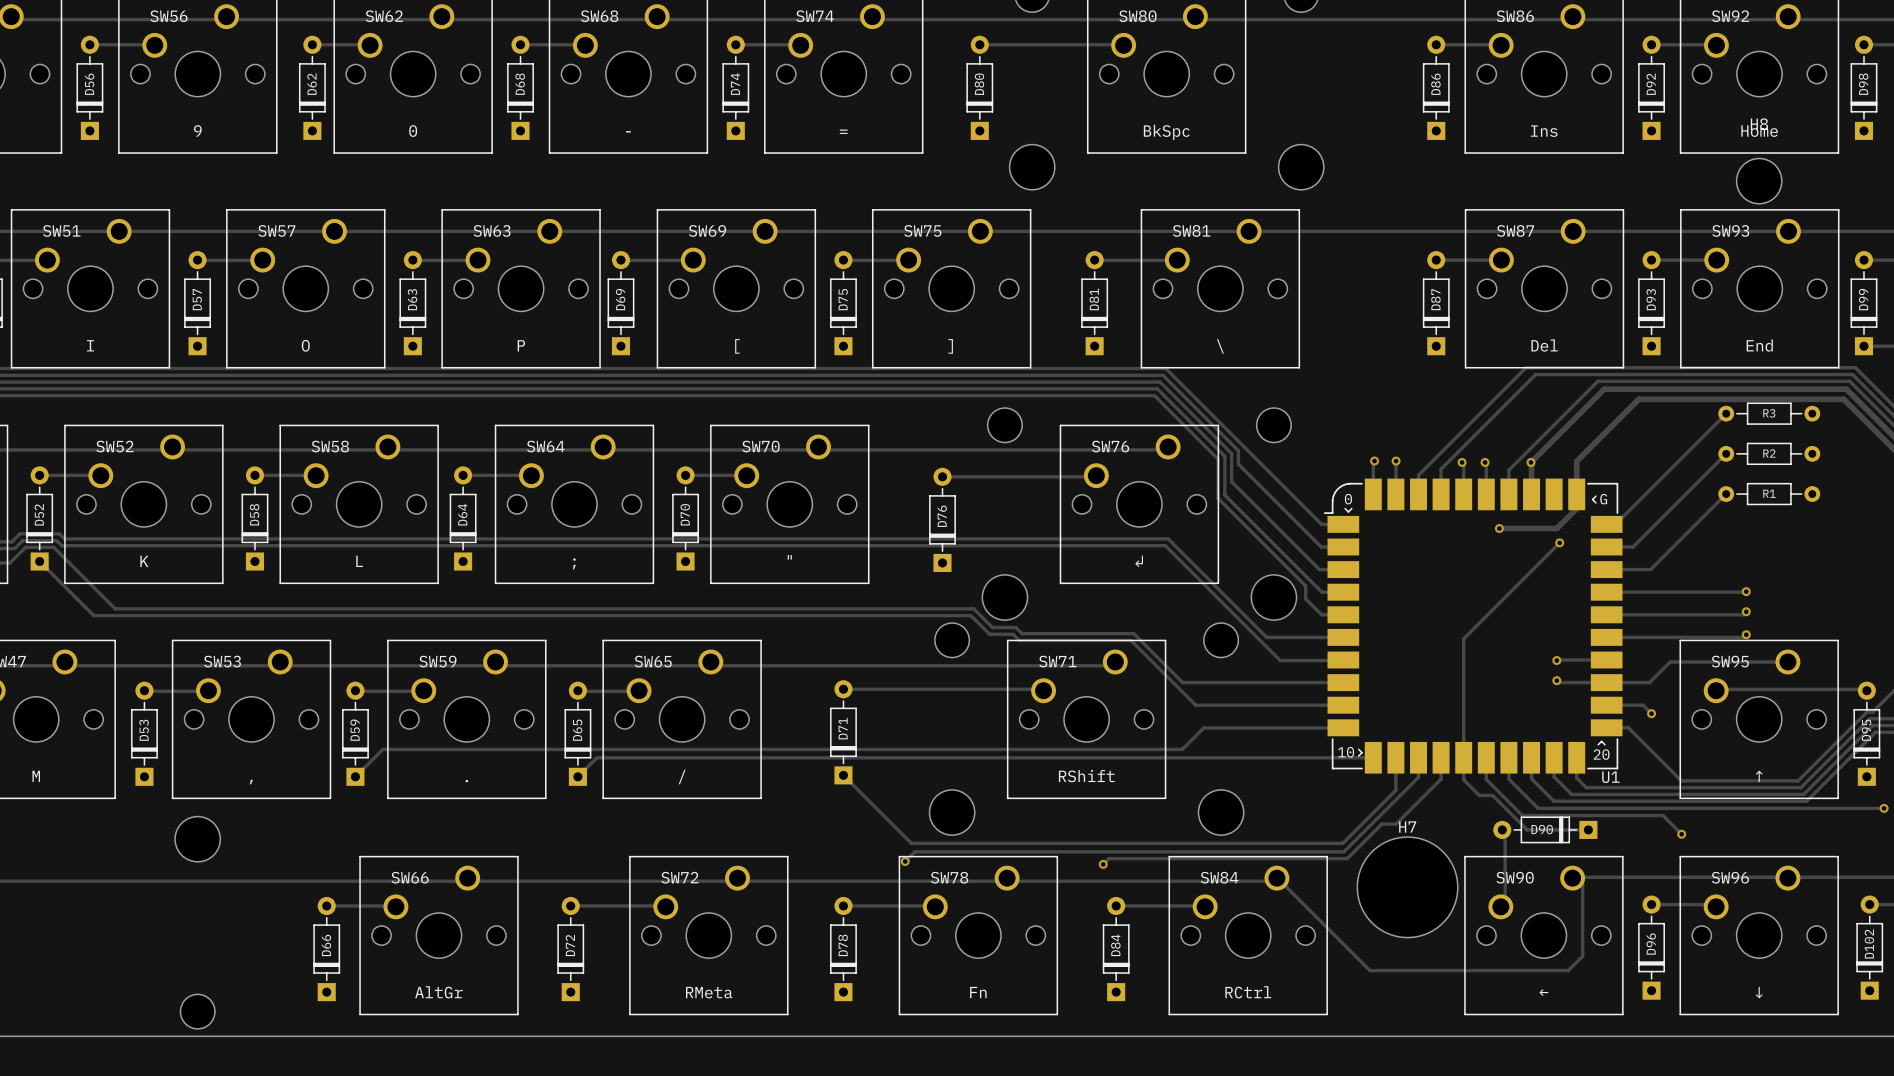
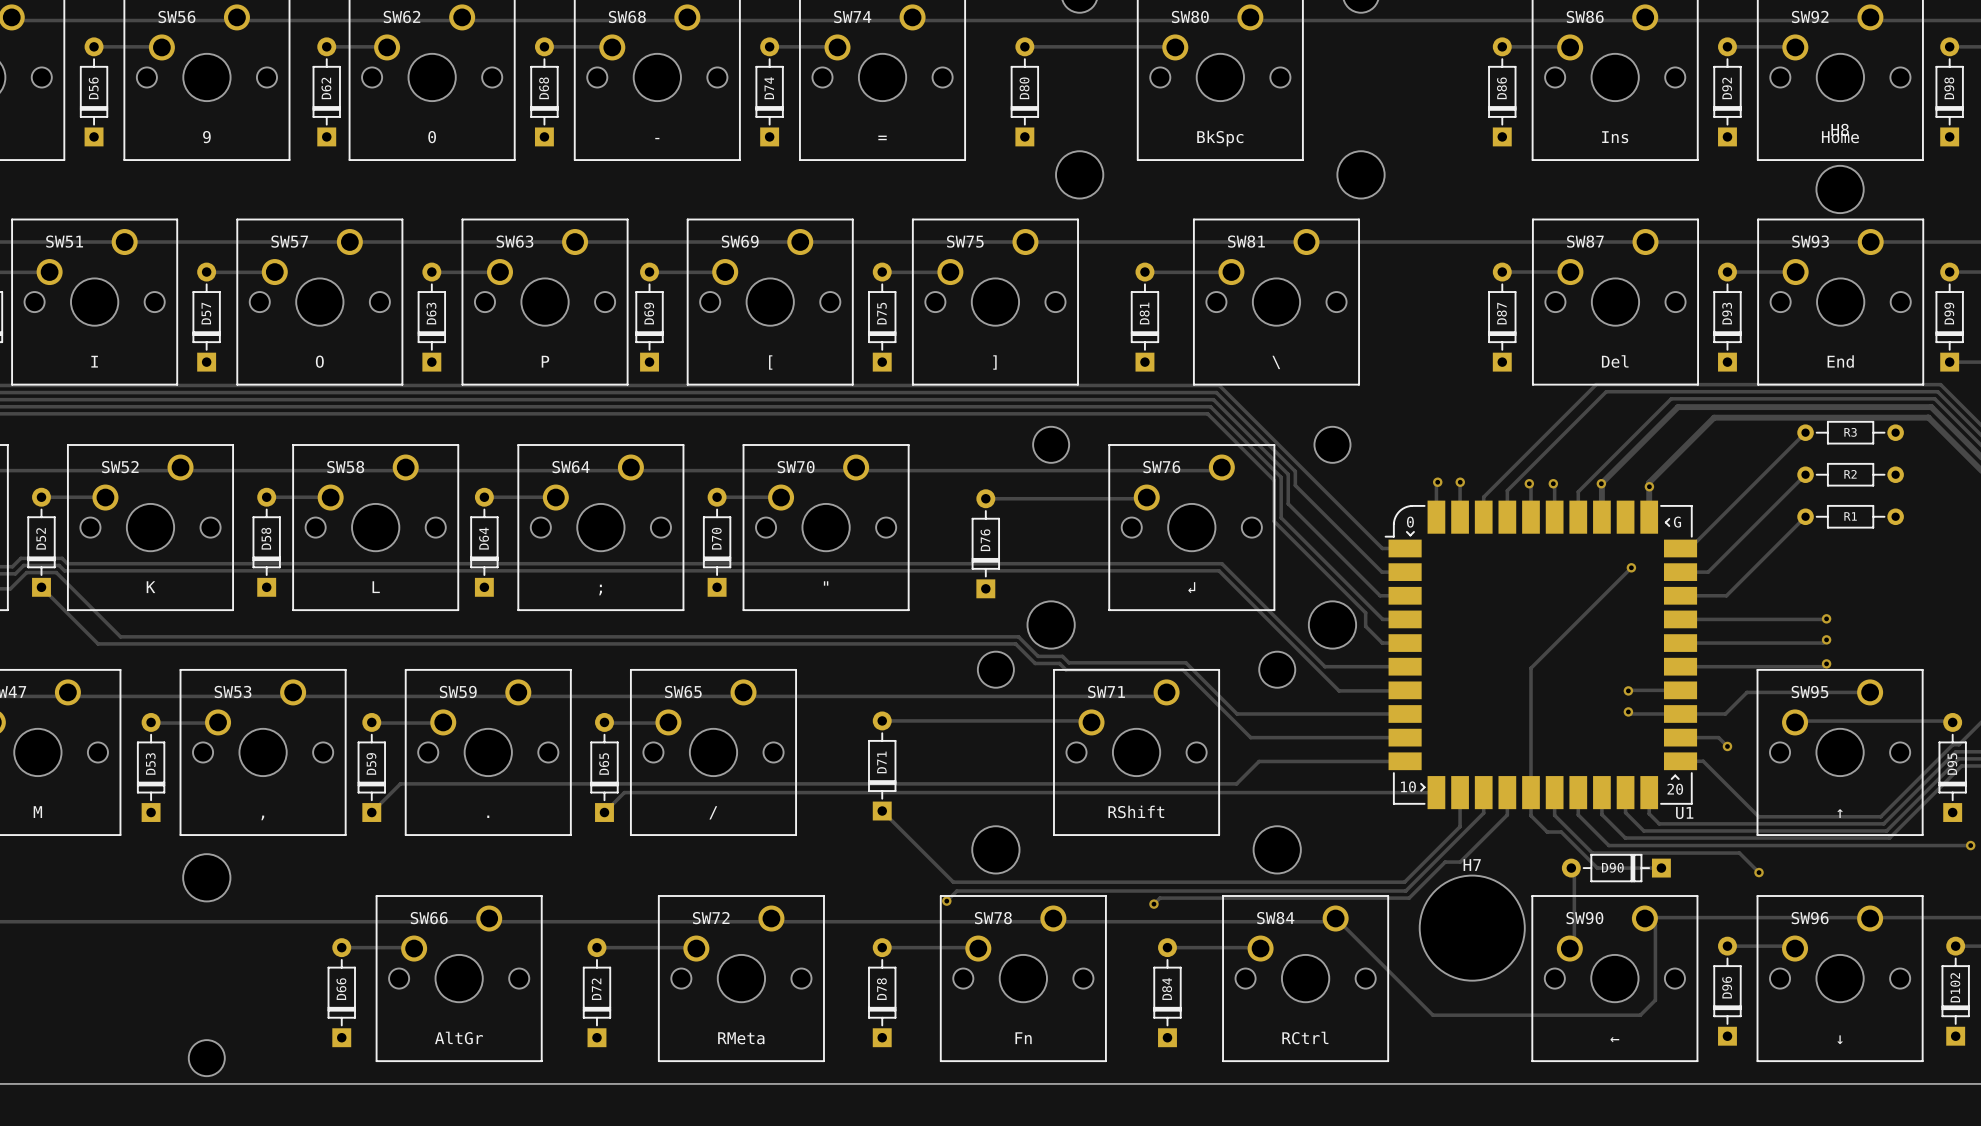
via: none -> (1649, 486)
track: (1576, 494) (1576, 508) (1556, 528) (1499, 528) -> none
via: (1499, 528) -> none

